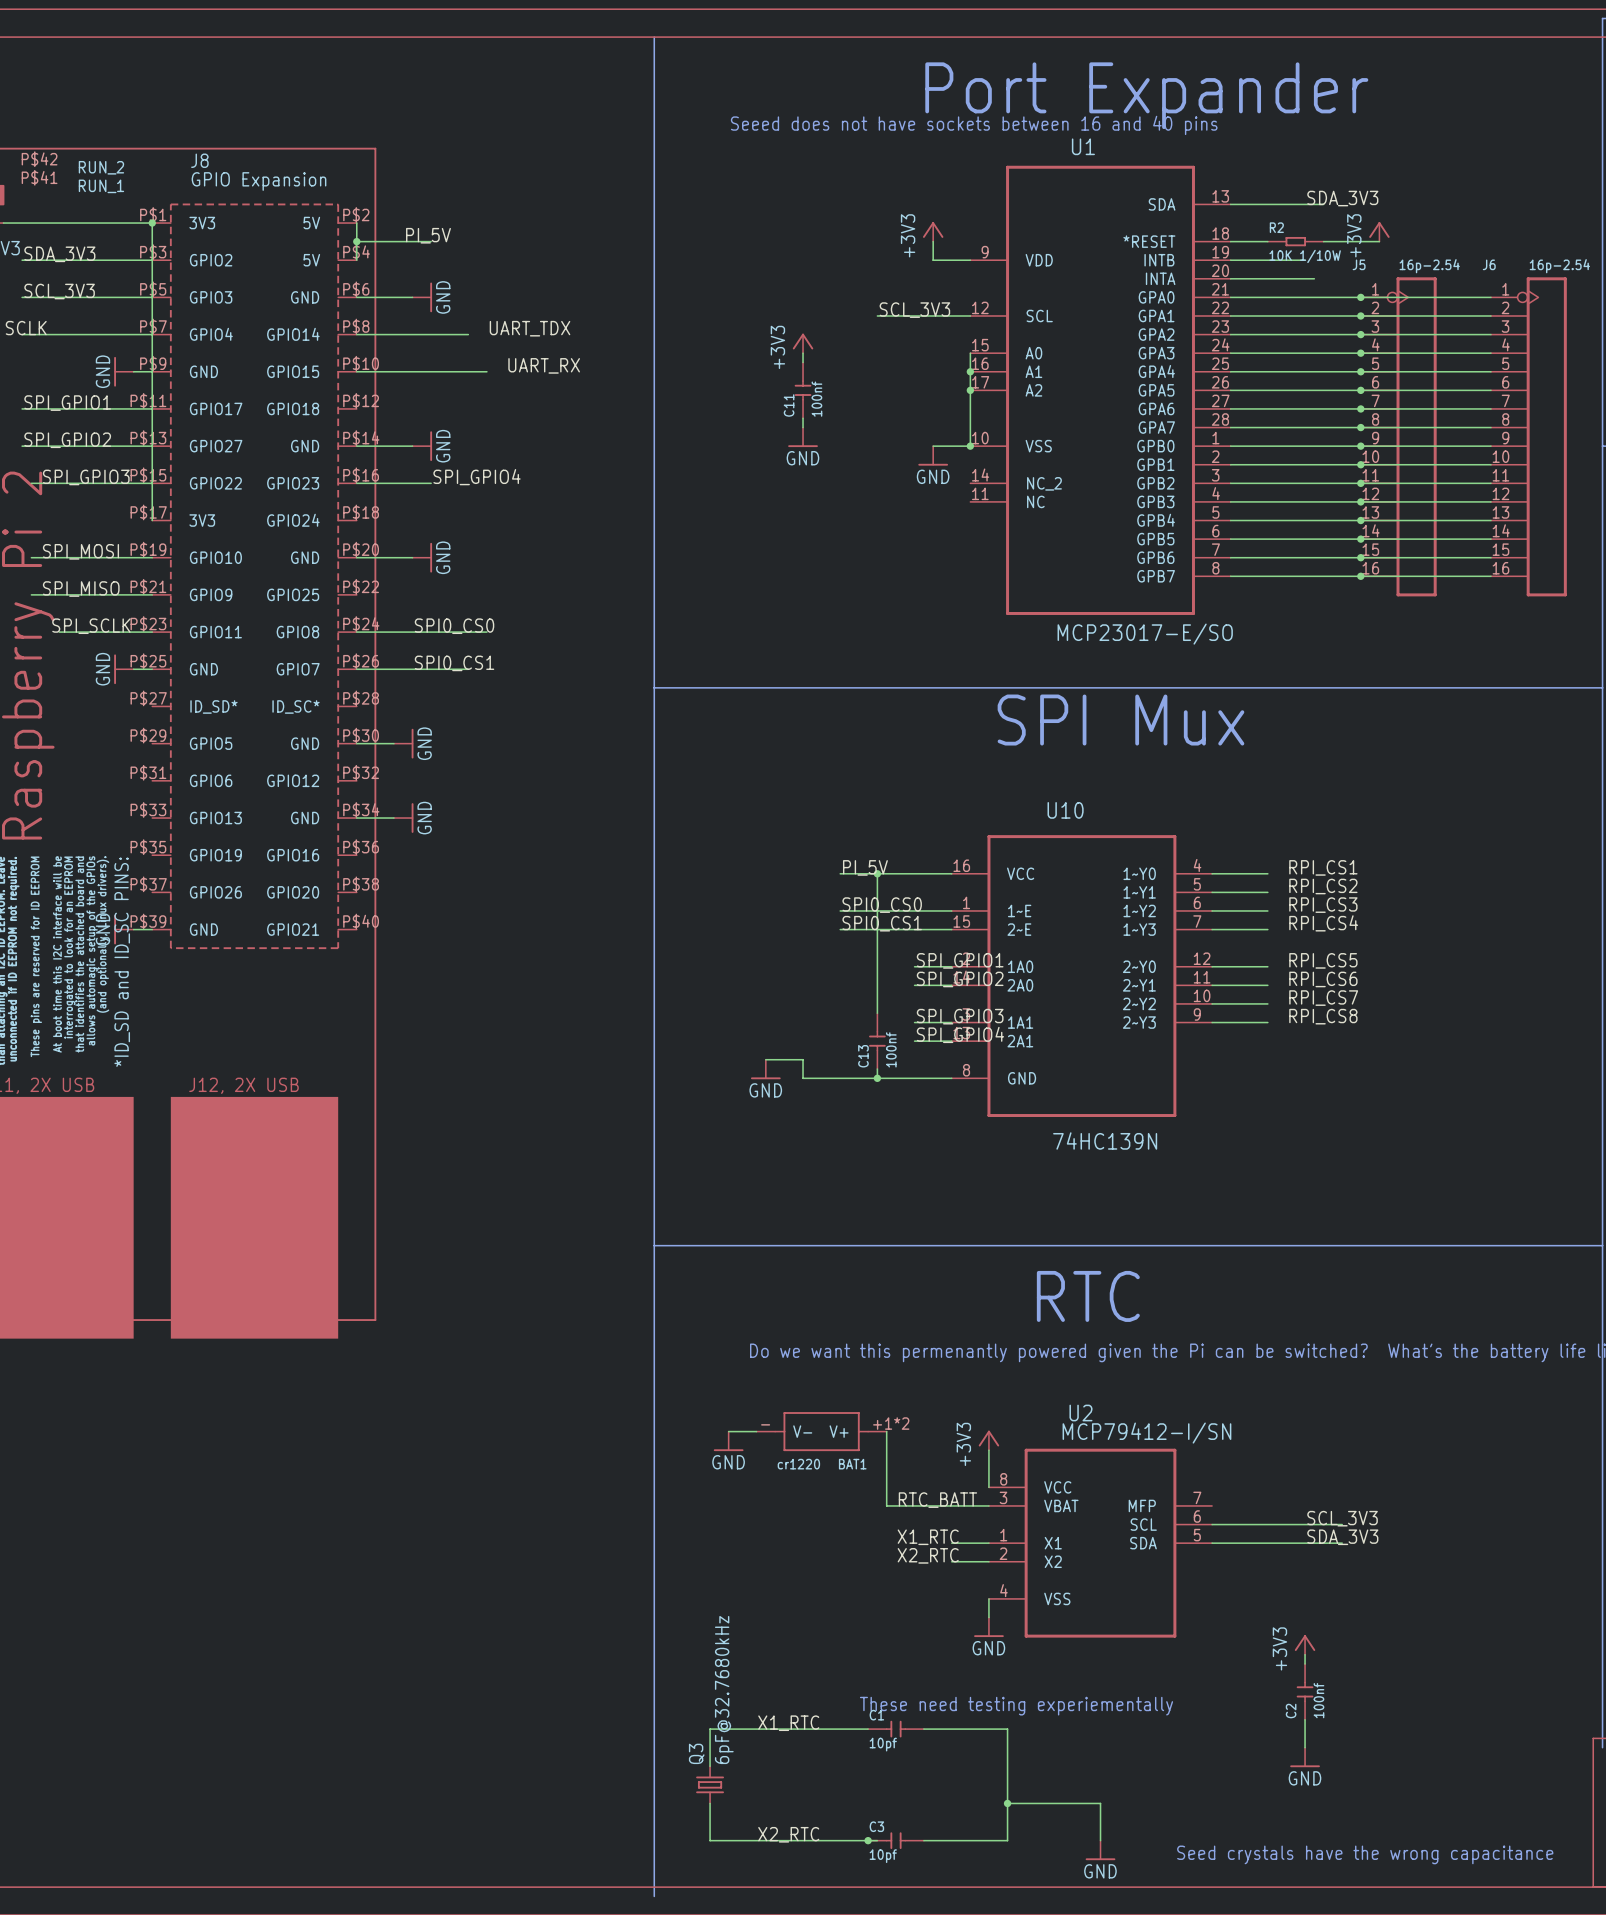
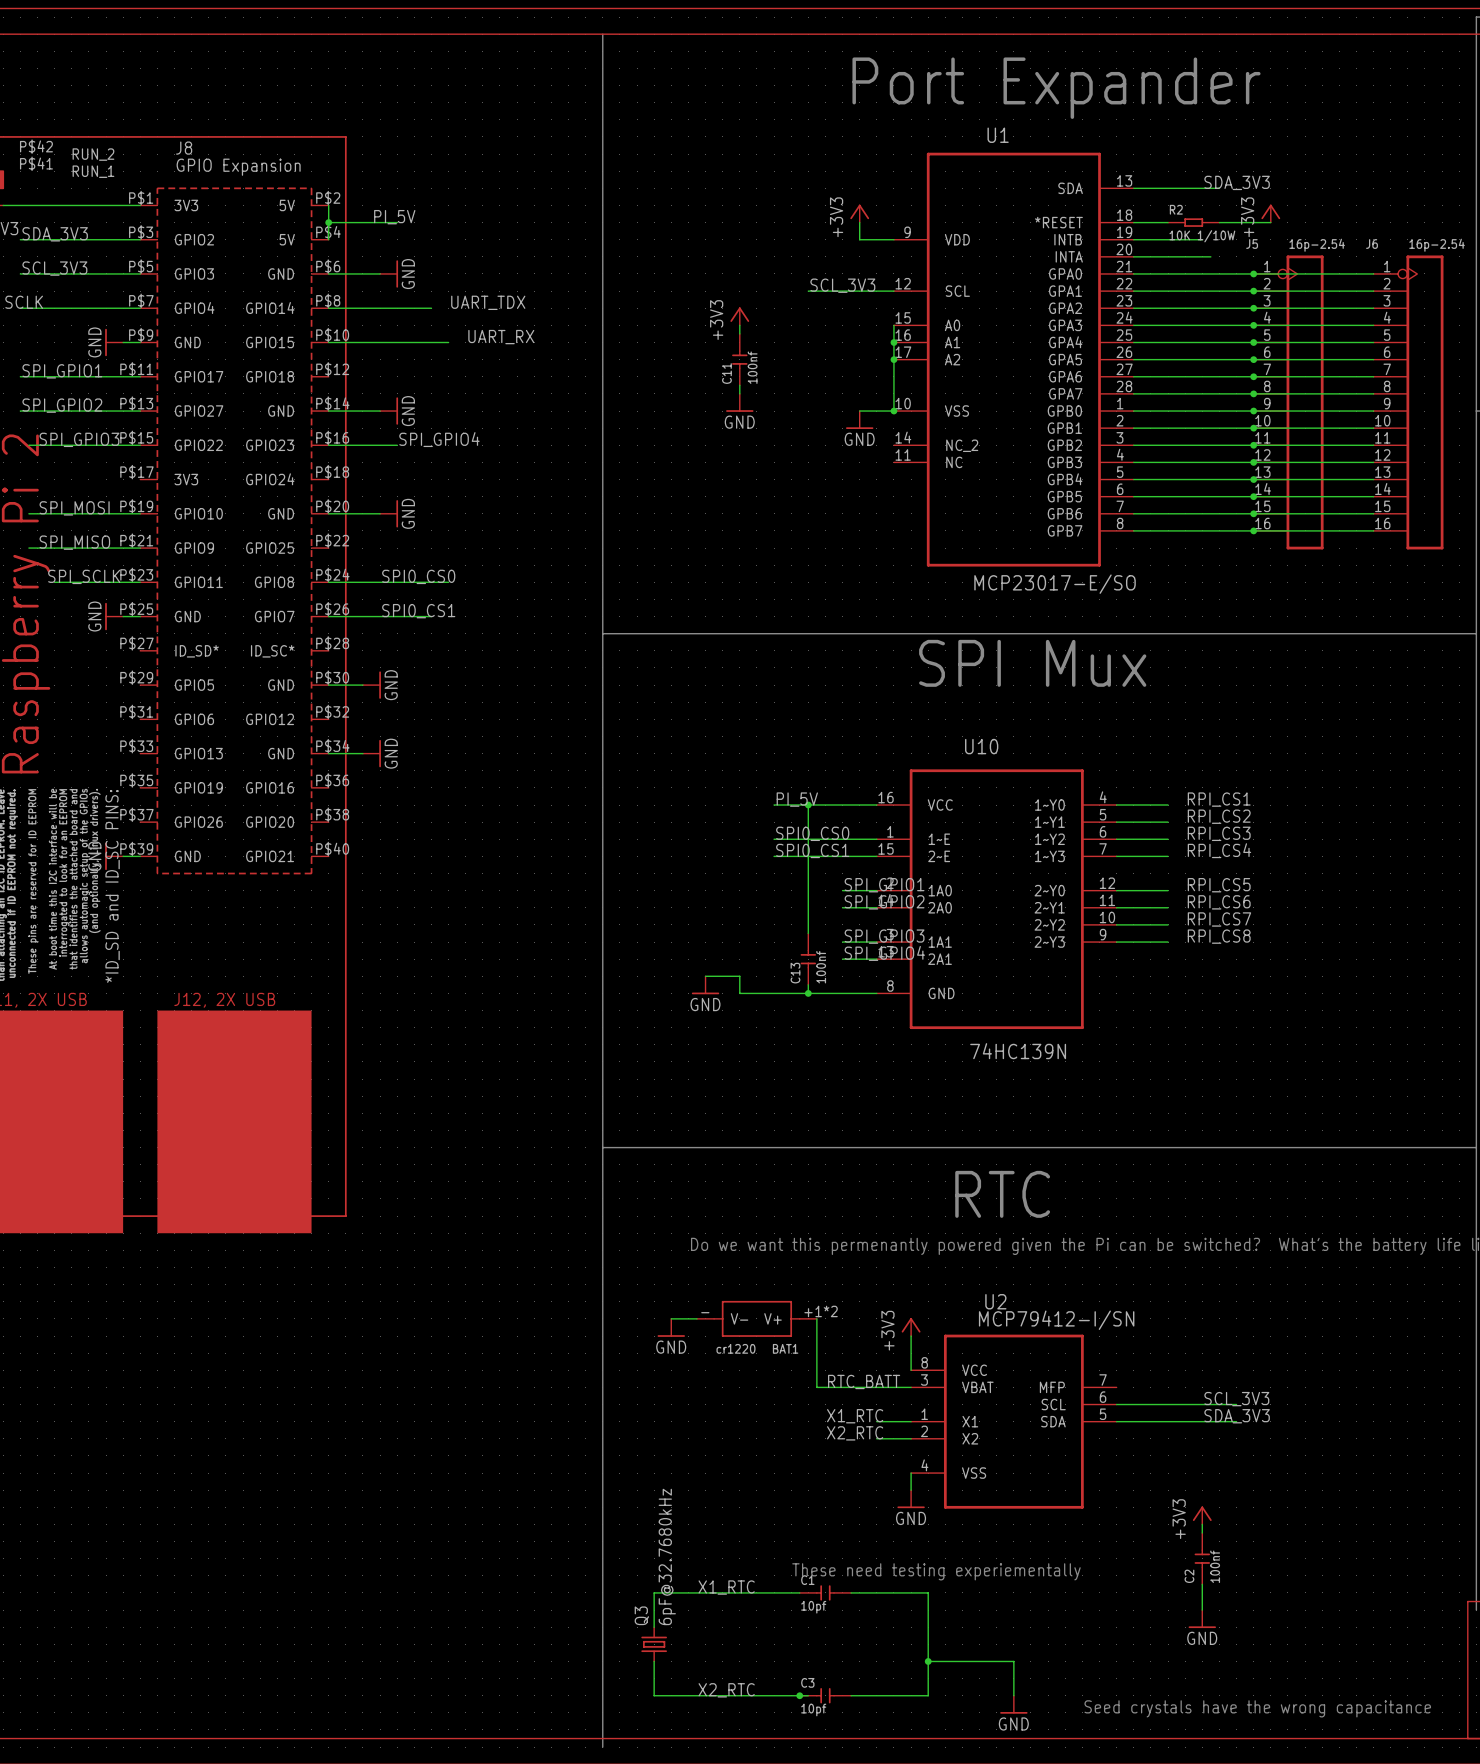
text: Seeed does not have sockets between 16 and 40 pins (974, 125) -> none
wire: (152, 223) (152, 520) -> none
junction: (152, 223) -> none

